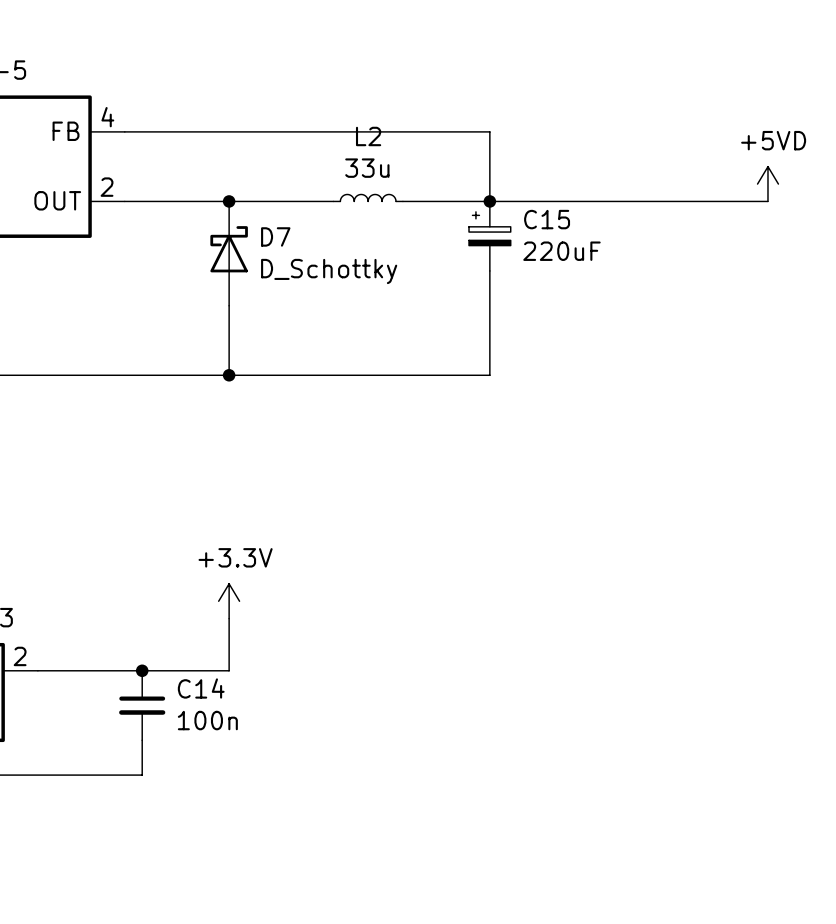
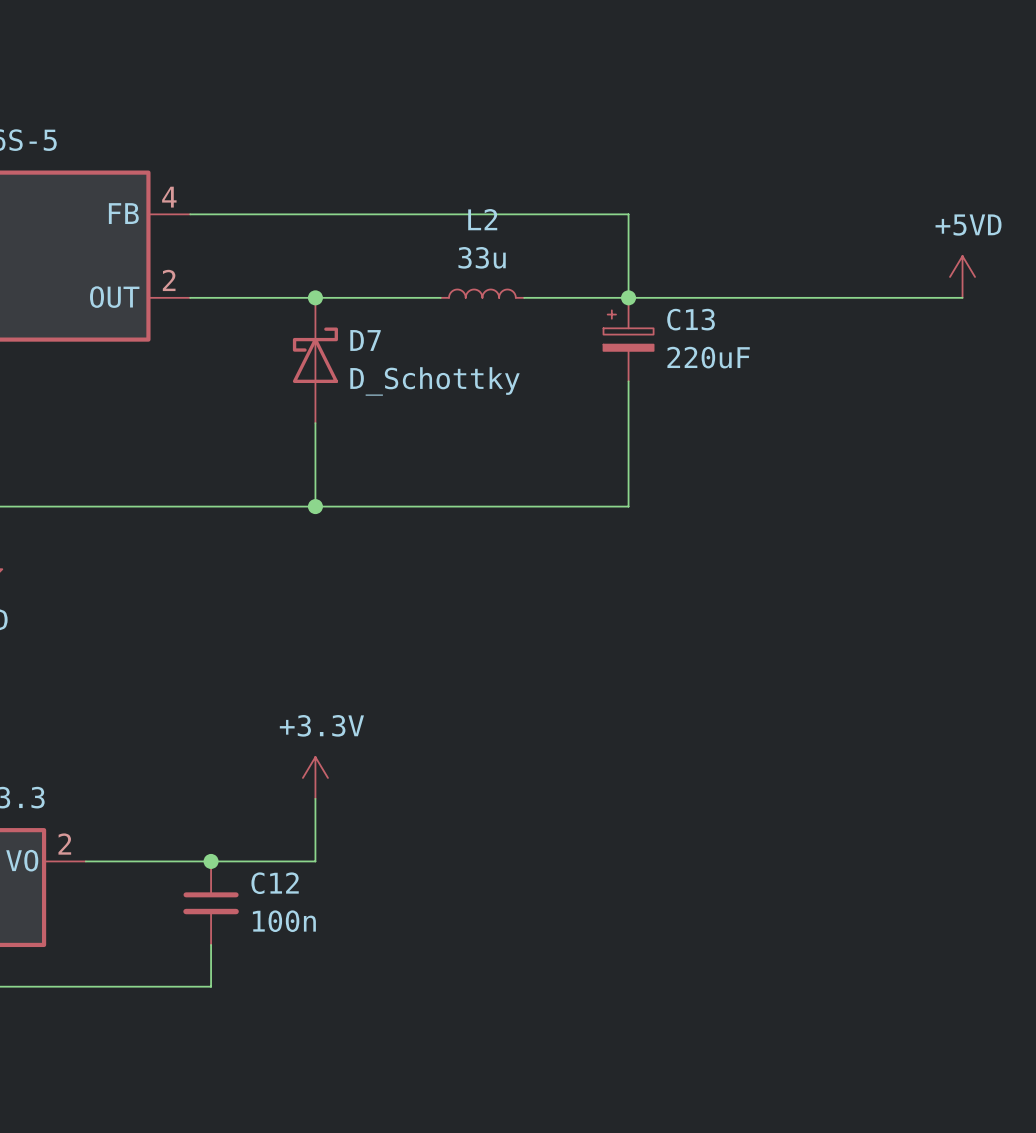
C15 name: C15 (547, 219) -> C13 (691, 319)
C14 name: C14 (201, 688) -> C12 (275, 883)

